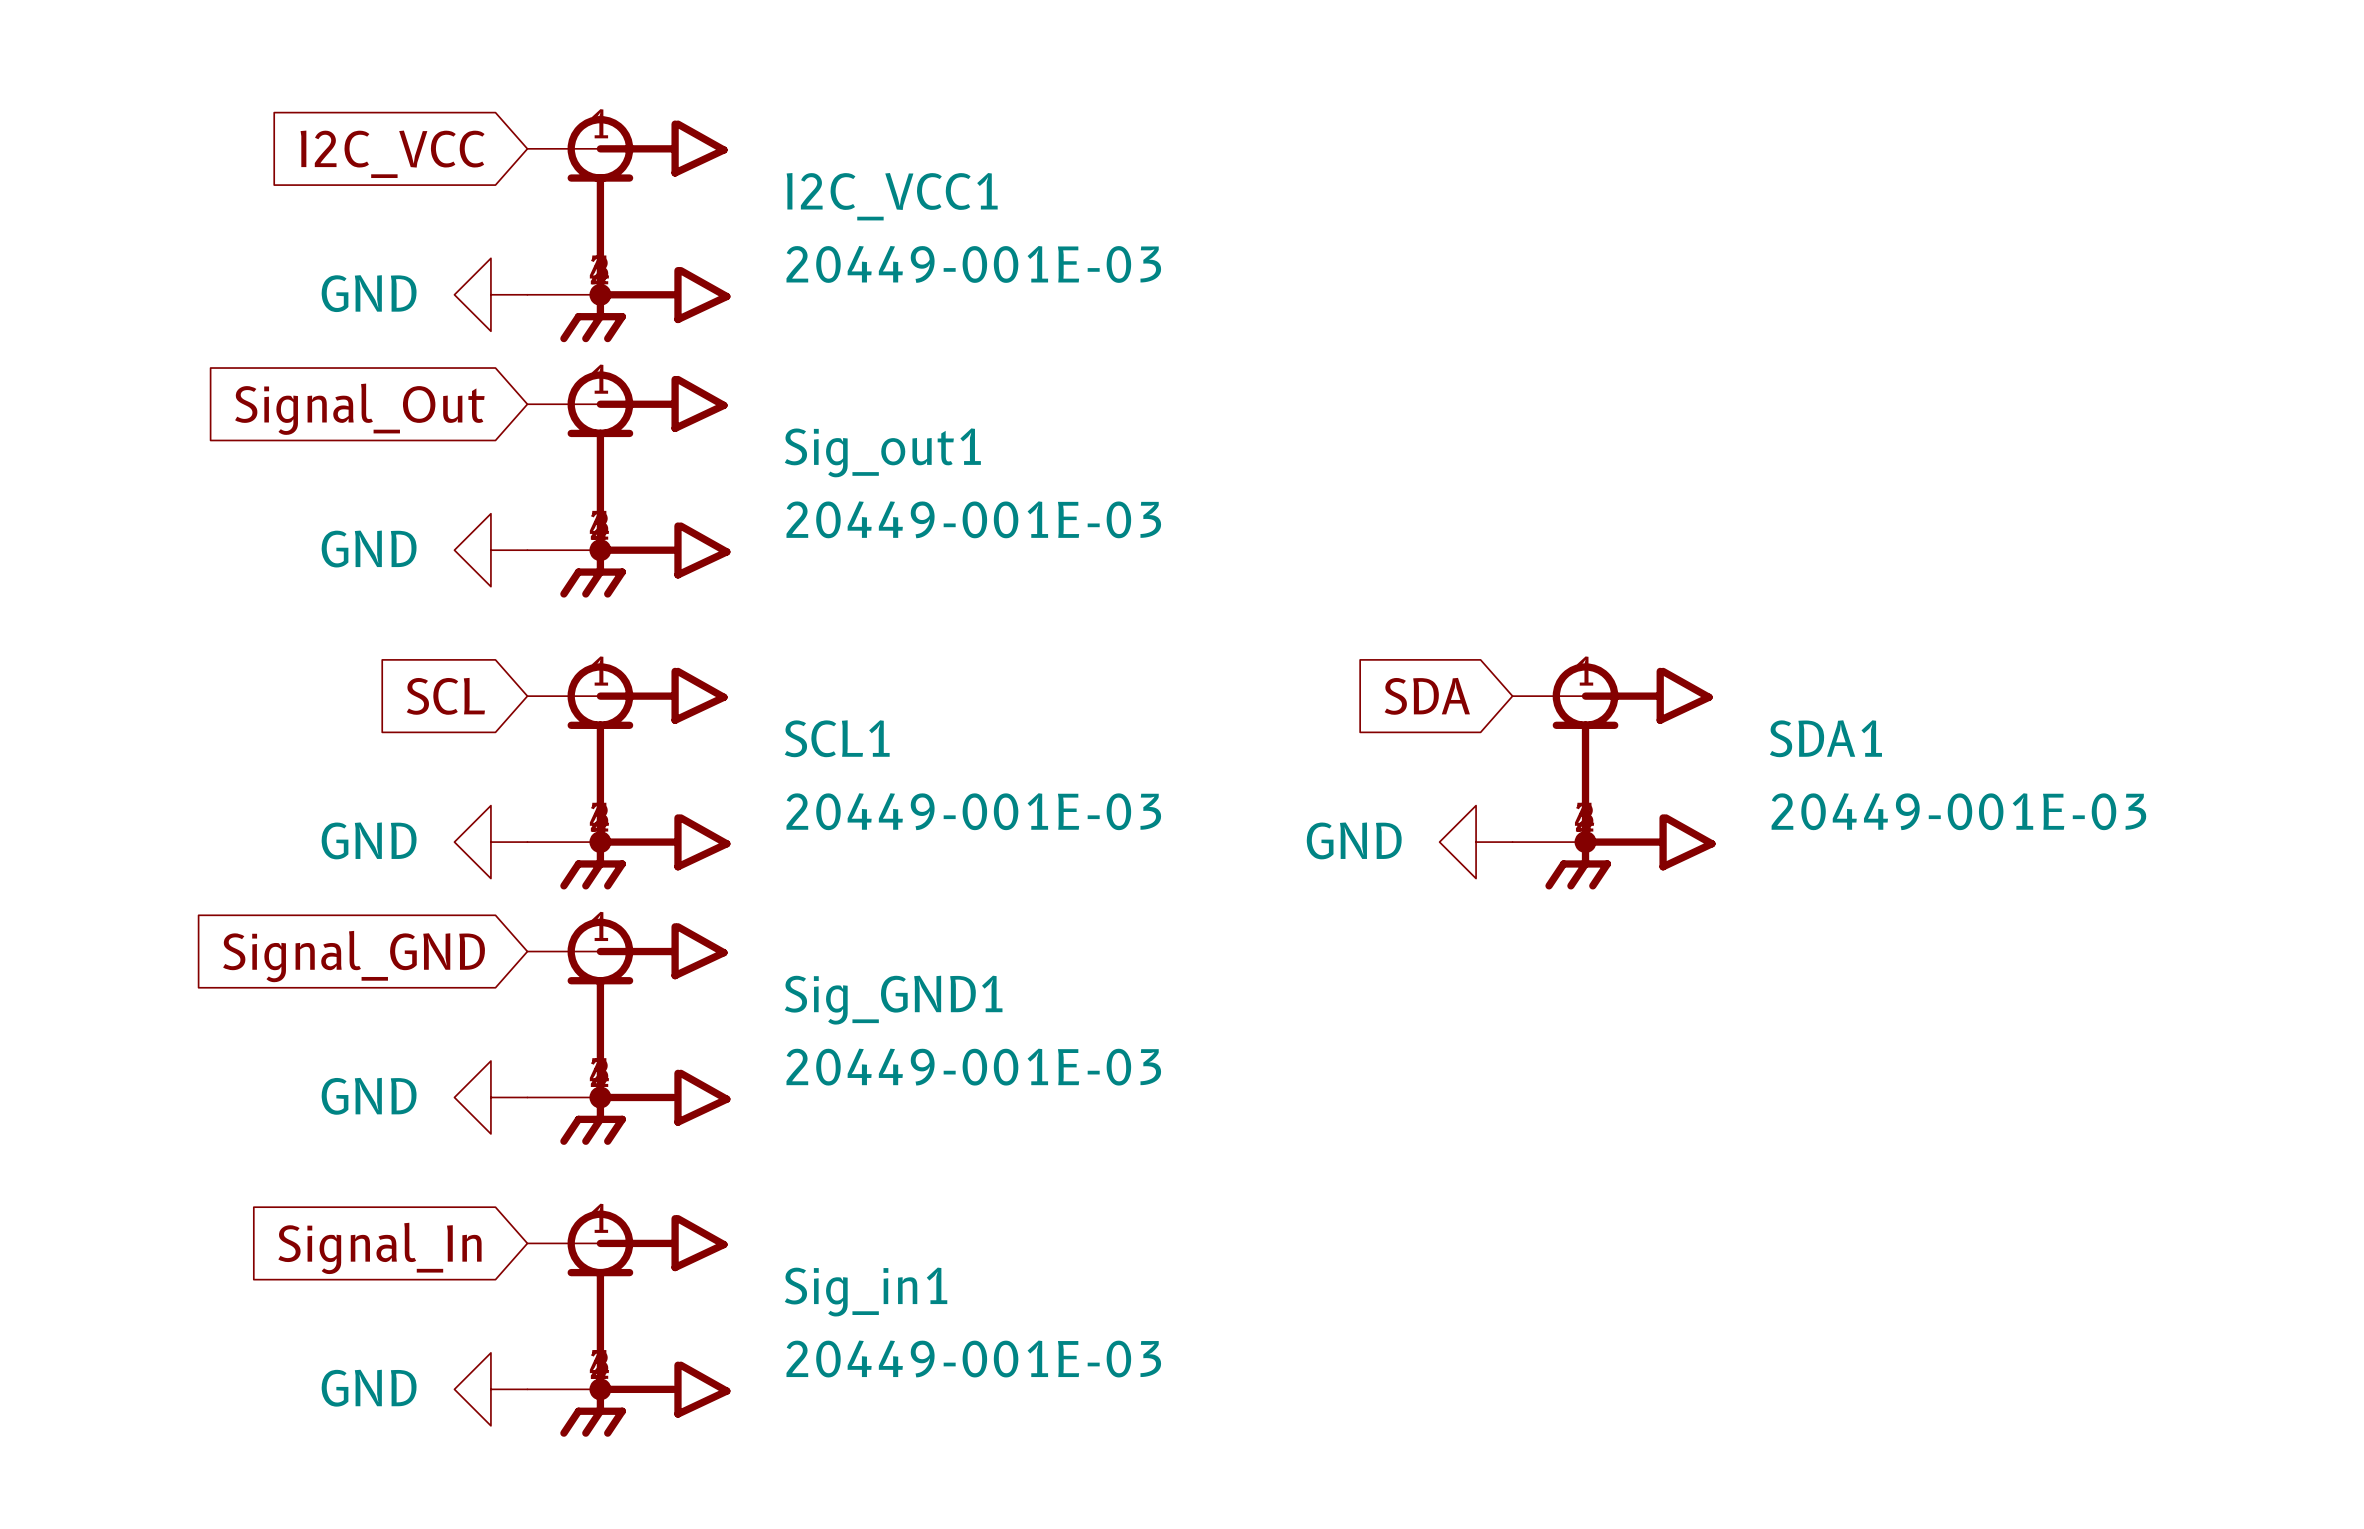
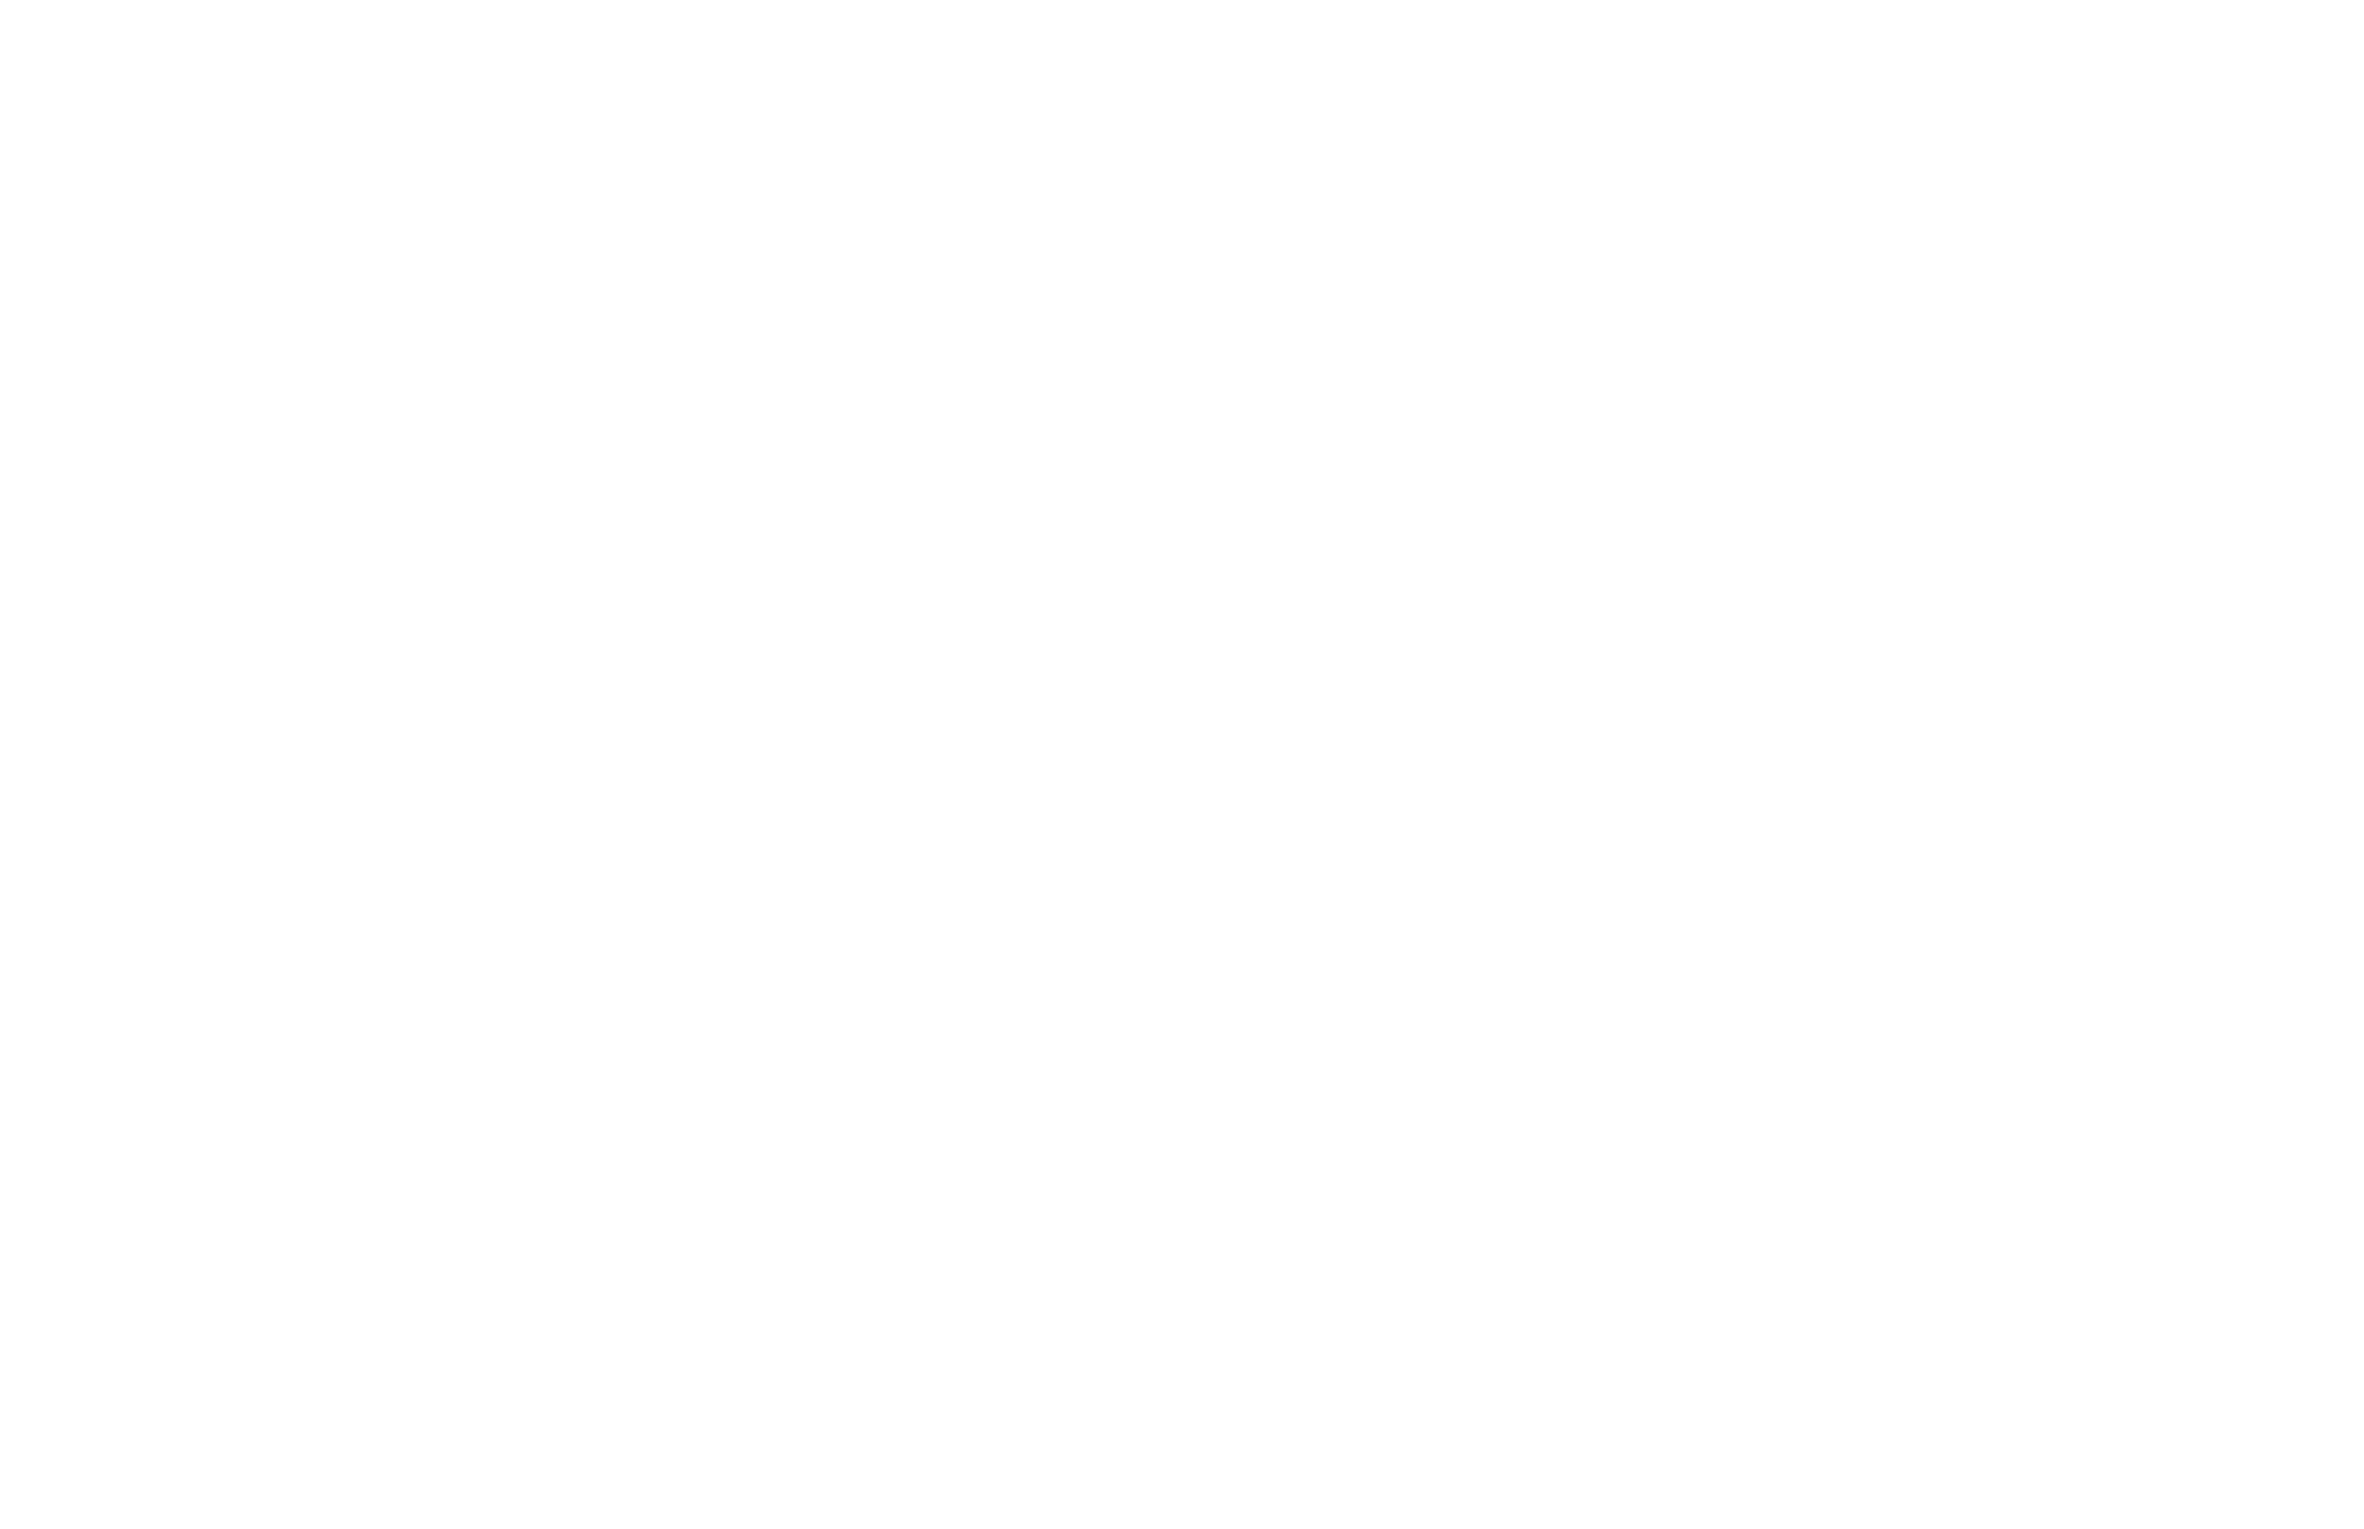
global label: I2C_VCC (392, 154) -> none
I2C_VCC1: 20449-001E-03 (628, 229) -> none
power symbol: GND (490, 294) -> none
global label: Signal_Out (359, 409) -> none
Sig_out1: 20449-001E-03 (628, 484) -> none
power symbol: GND (490, 550) -> none
global label: SCL (445, 696) -> none
global label: SDA (1427, 696) -> none
SCL1: 20449-001E-03 (628, 776) -> none
SDA1: 20449-001E-03 (1614, 776) -> none
power symbol: GND (490, 842) -> none
power symbol: GND (1476, 842) -> none
global label: Signal_GND (354, 956) -> none
Sig_GND1: 20449-001E-03 (628, 1031) -> none
power symbol: GND (490, 1097) -> none
global label: Signal_In (379, 1248) -> none
Sig_in1: 20449-001E-03 (628, 1323) -> none
power symbol: GND (490, 1389) -> none

